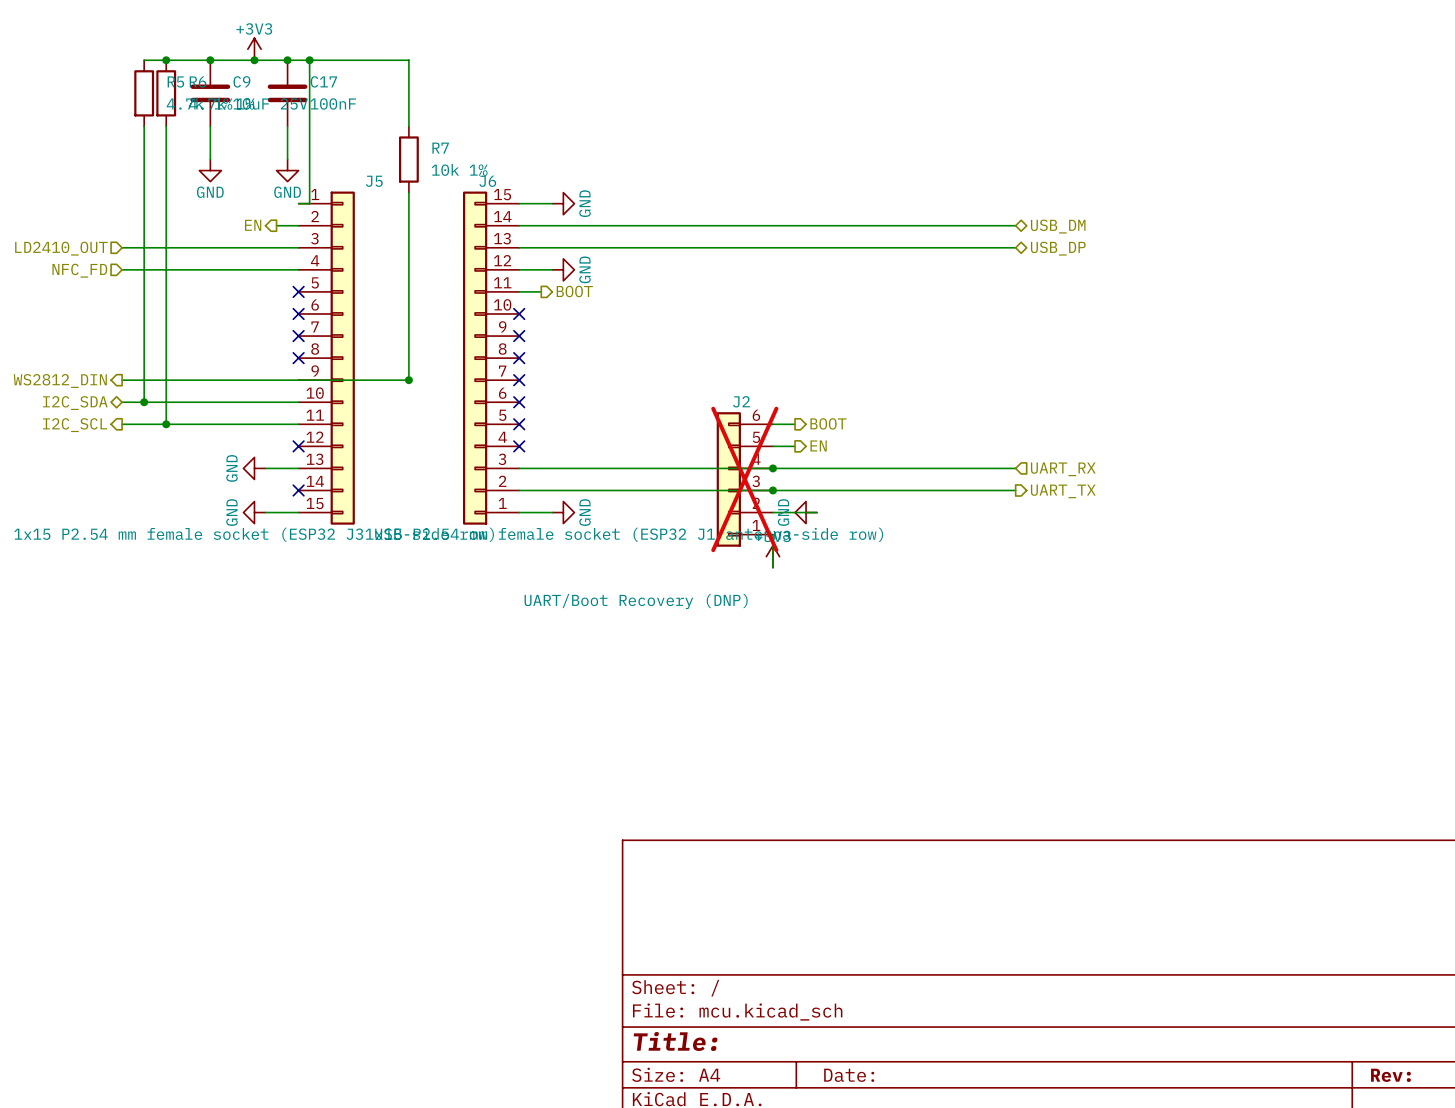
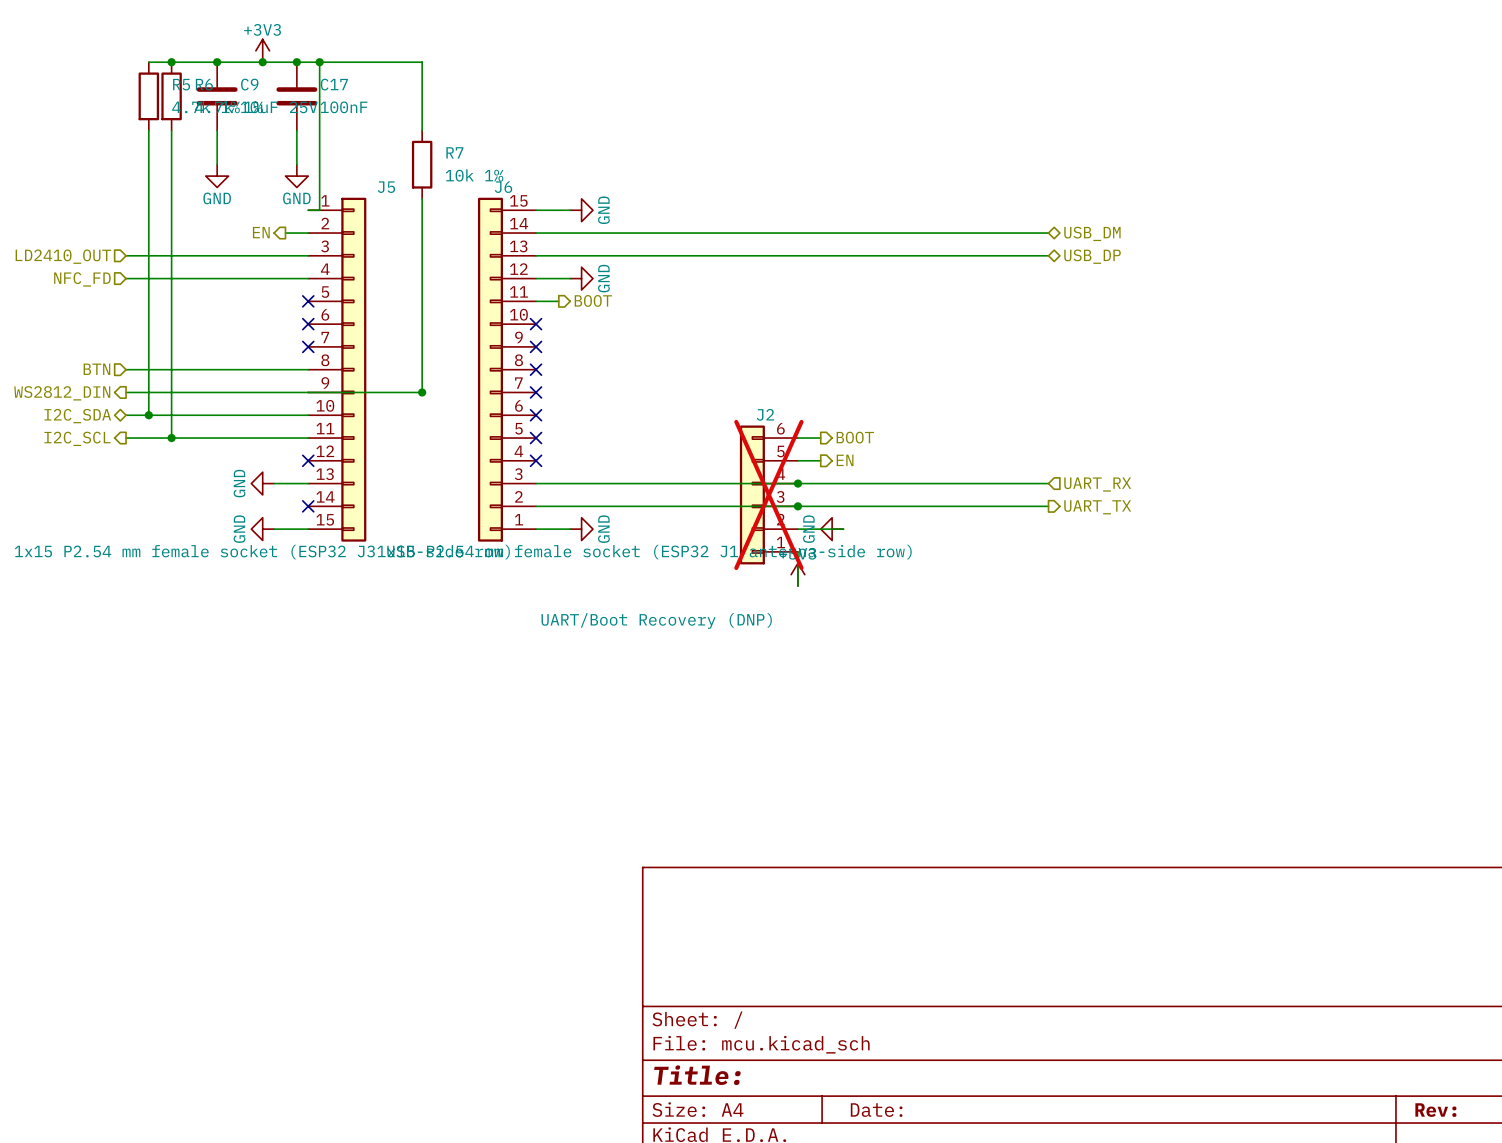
hierarchical label: none -> BTN (96, 369)
wire: none -> (126, 369) (308, 369)
no-connect mark: (298, 358) -> none

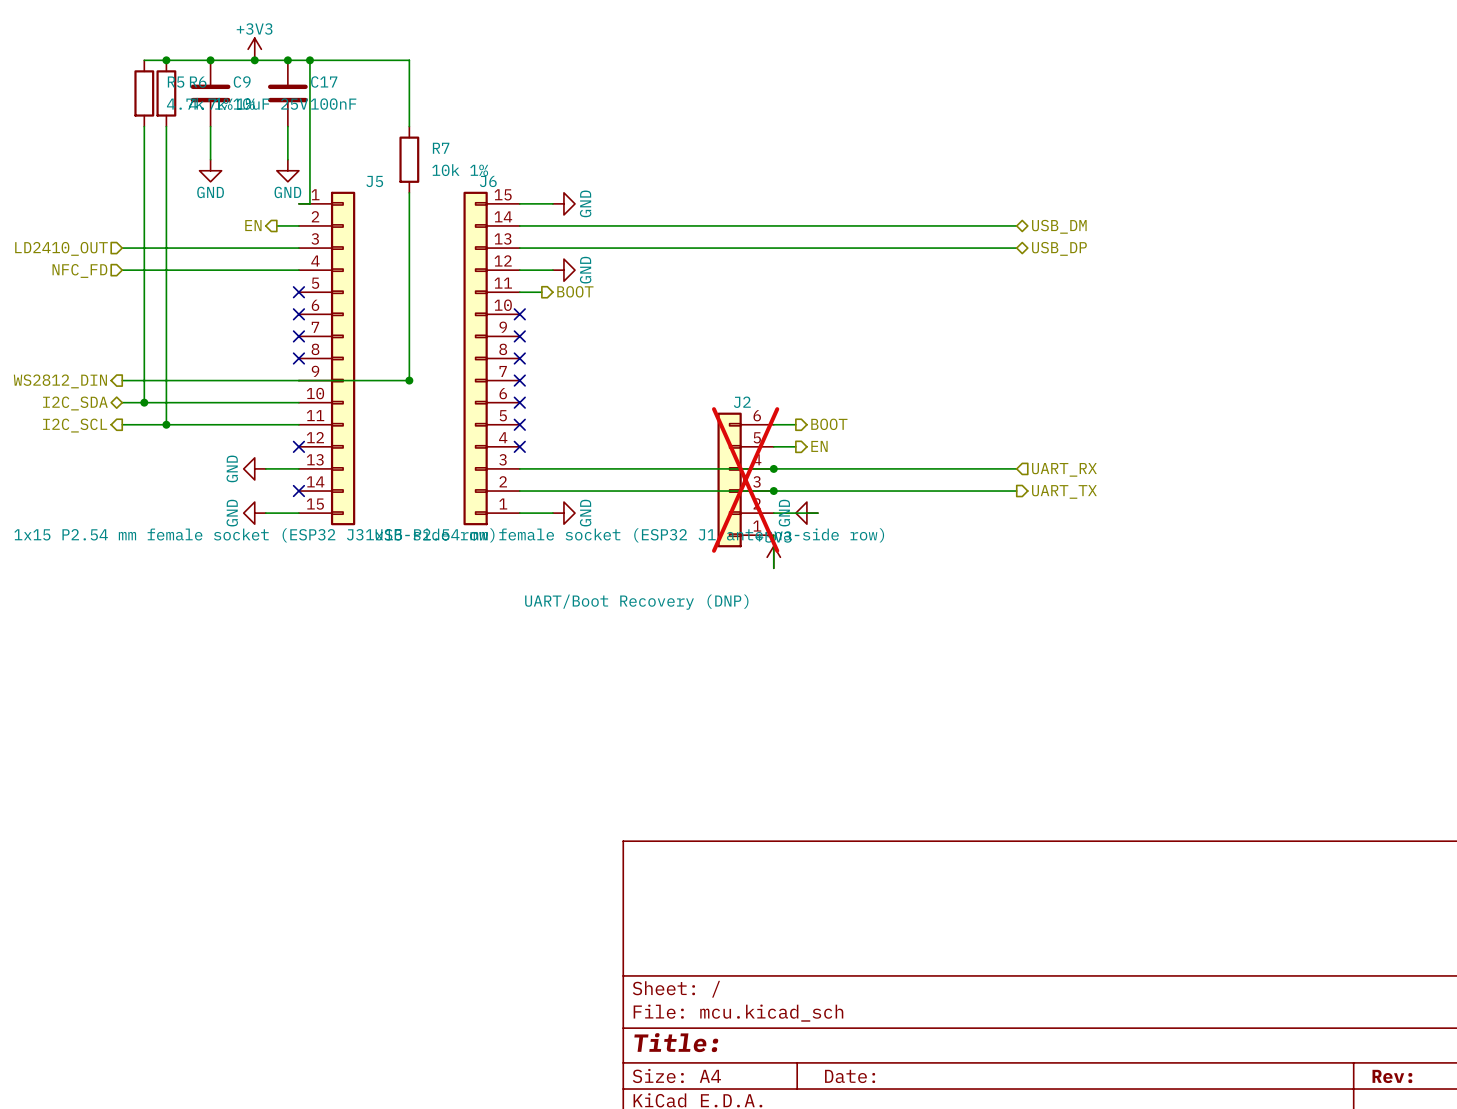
hierarchical label: BTN (96, 369) -> none
wire: (126, 369) (308, 369) -> none
no-connect mark: none -> (298, 358)

